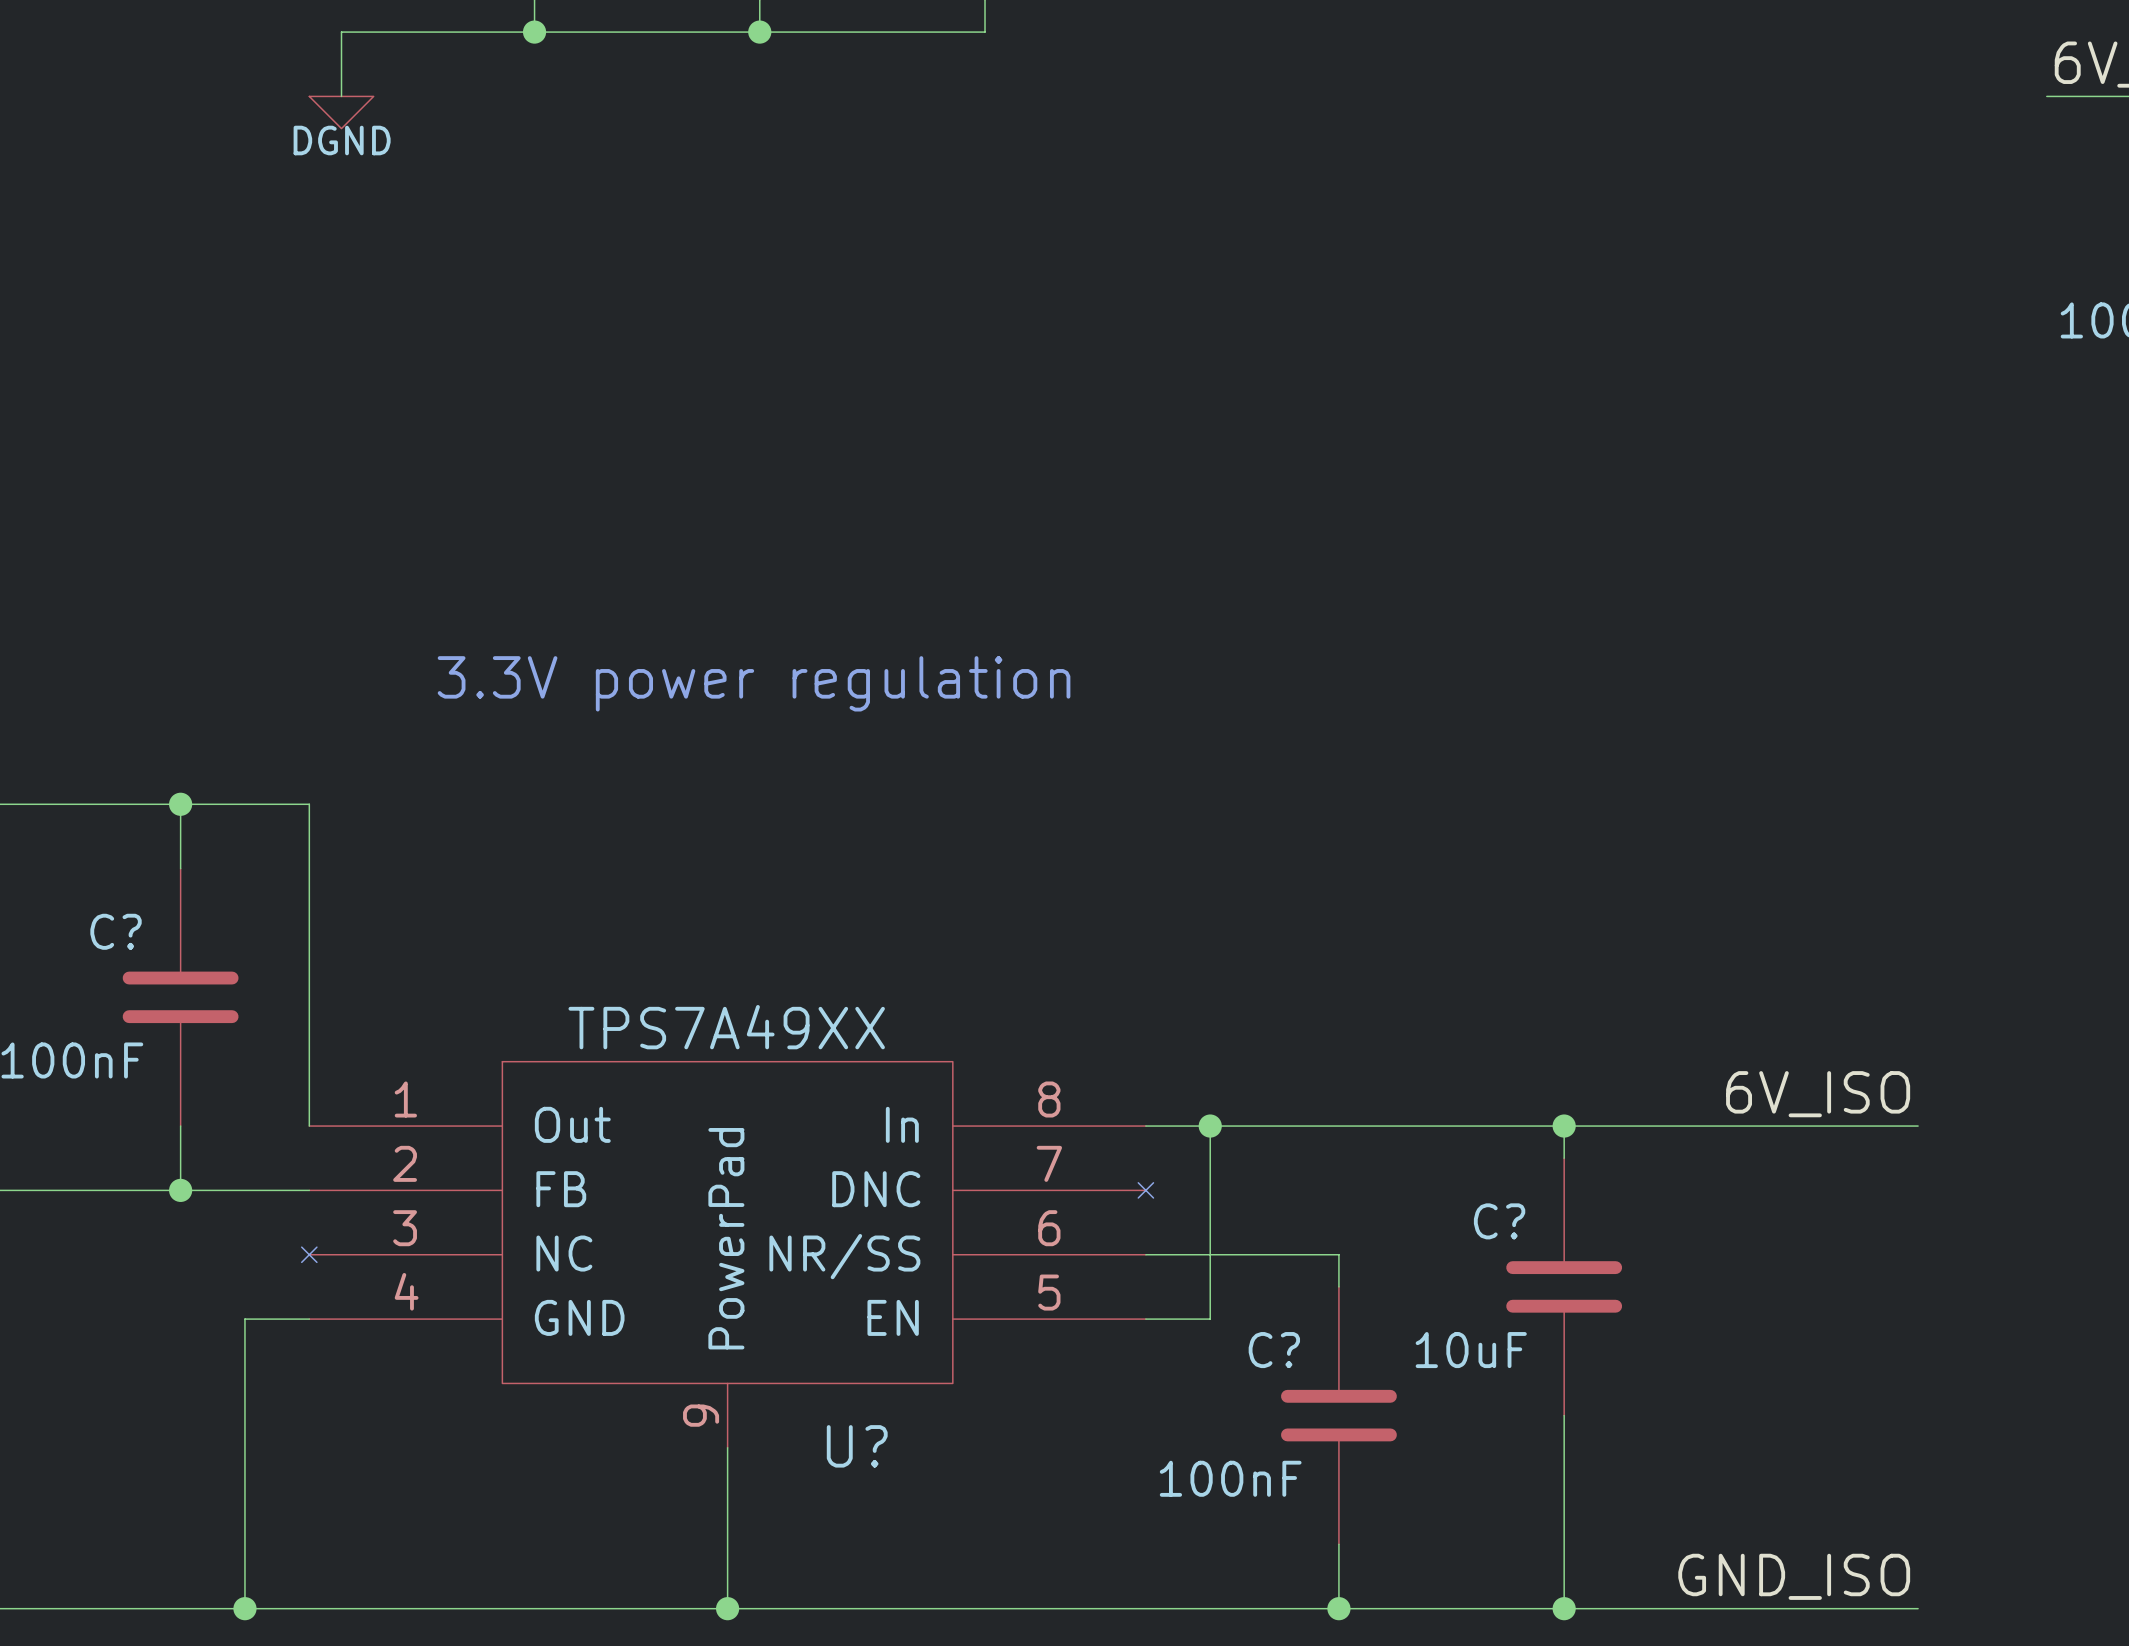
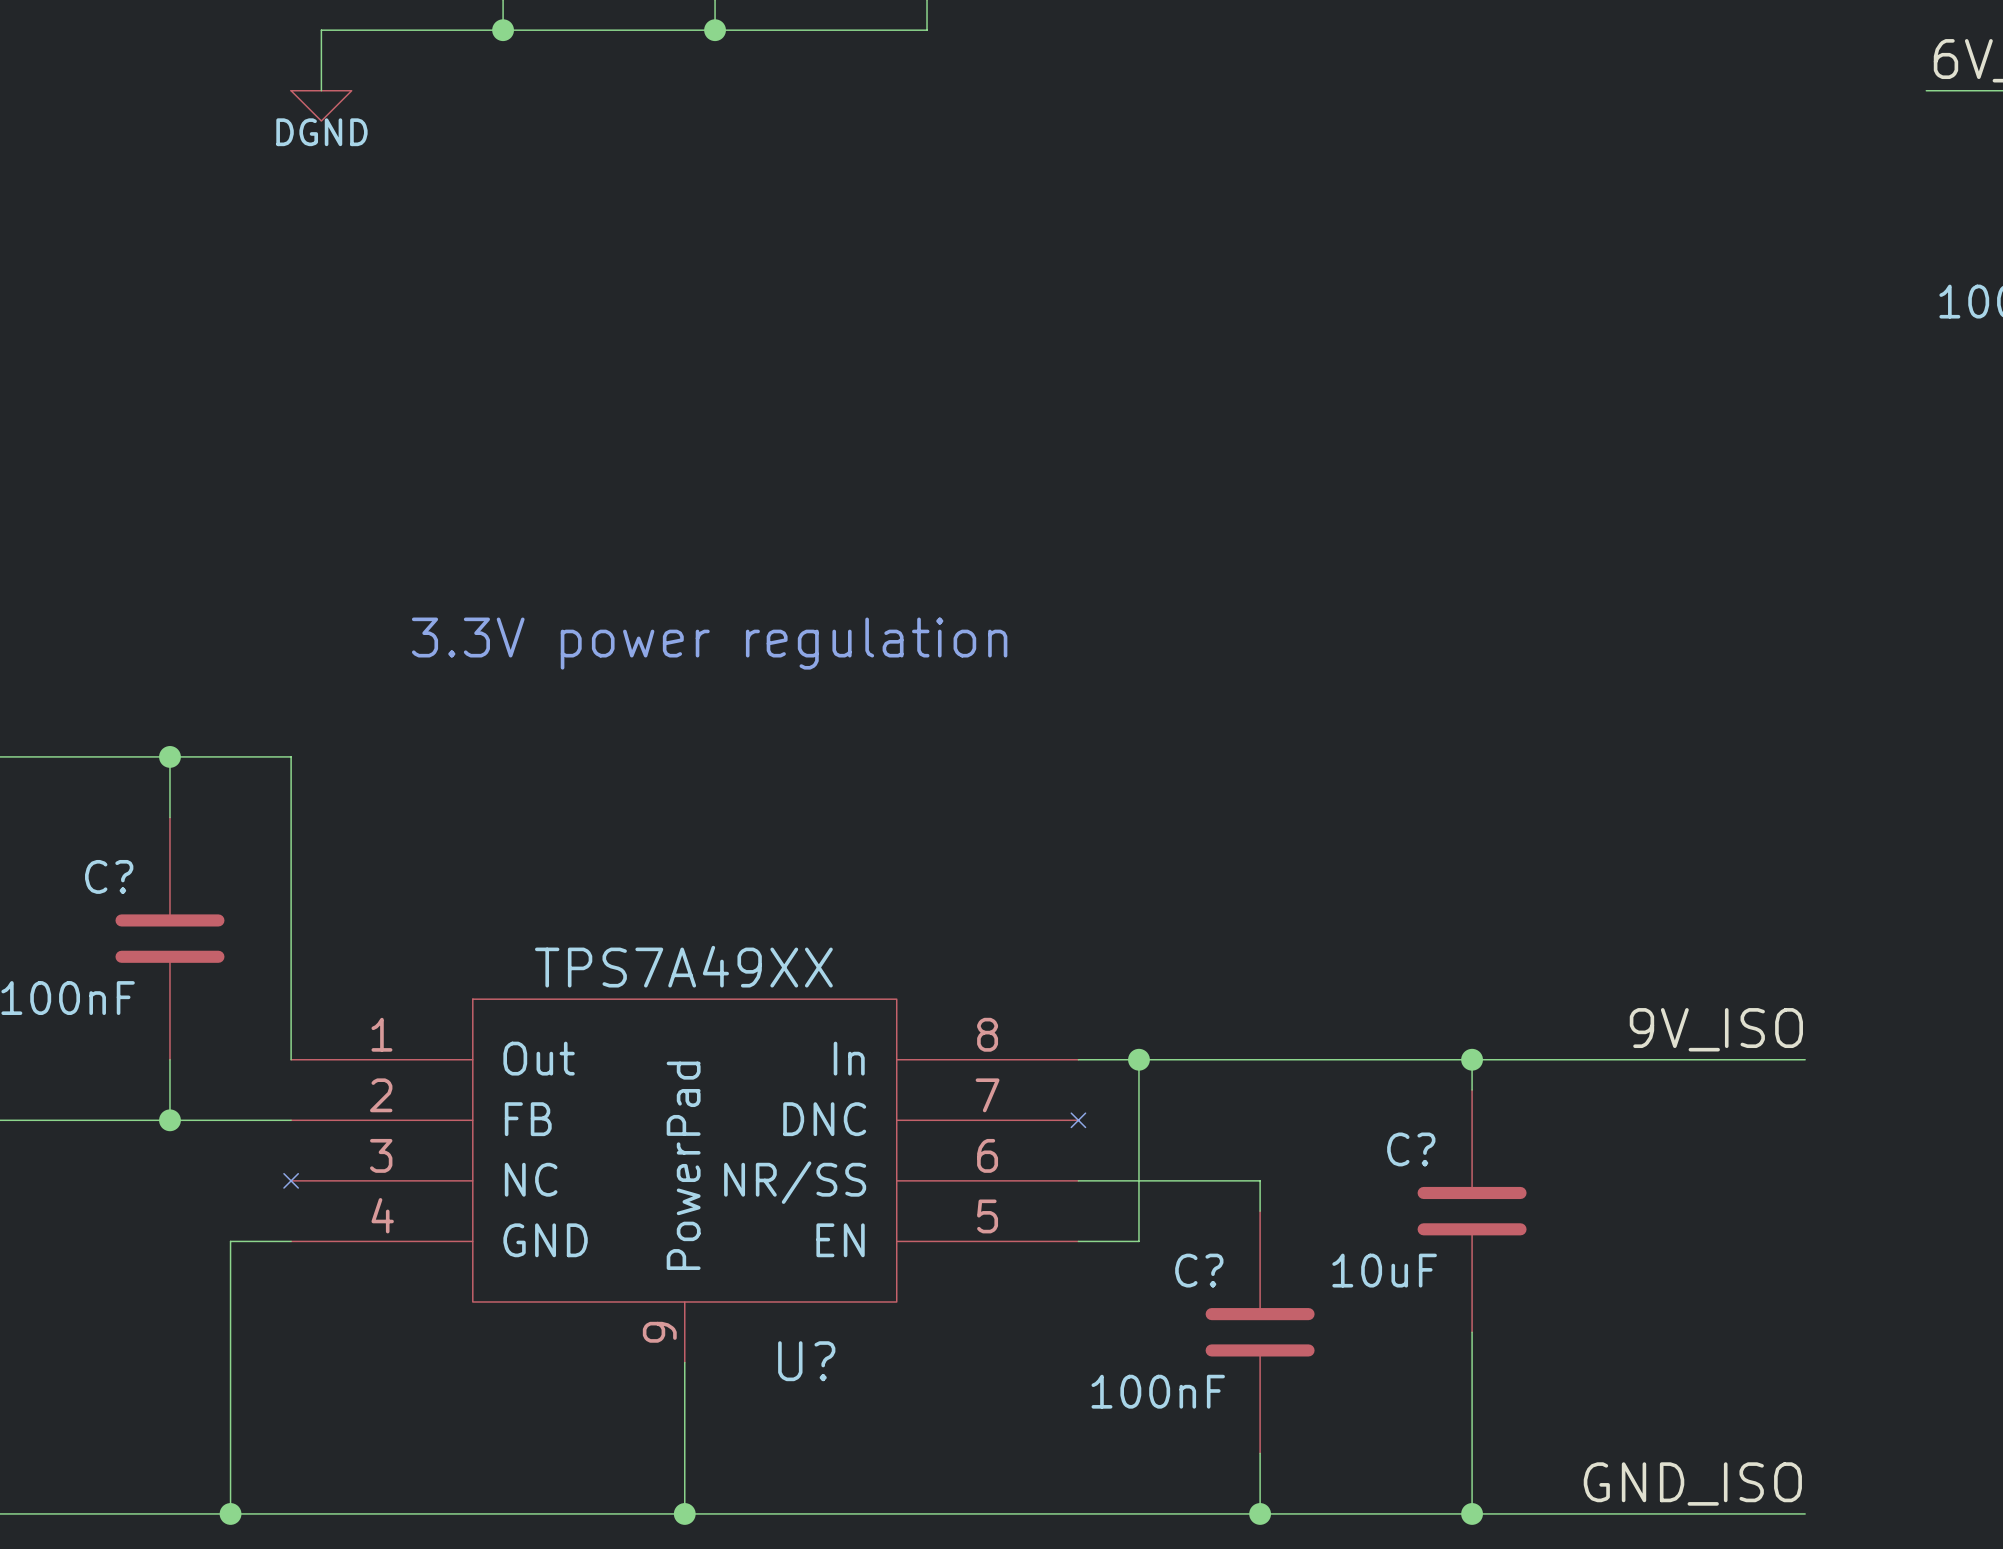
label: 6V_ISO (1818, 1094) -> 9V_ISO (1716, 1029)
label position: GND_ISO (1794, 1576) -> GND_ISO (1692, 1483)

